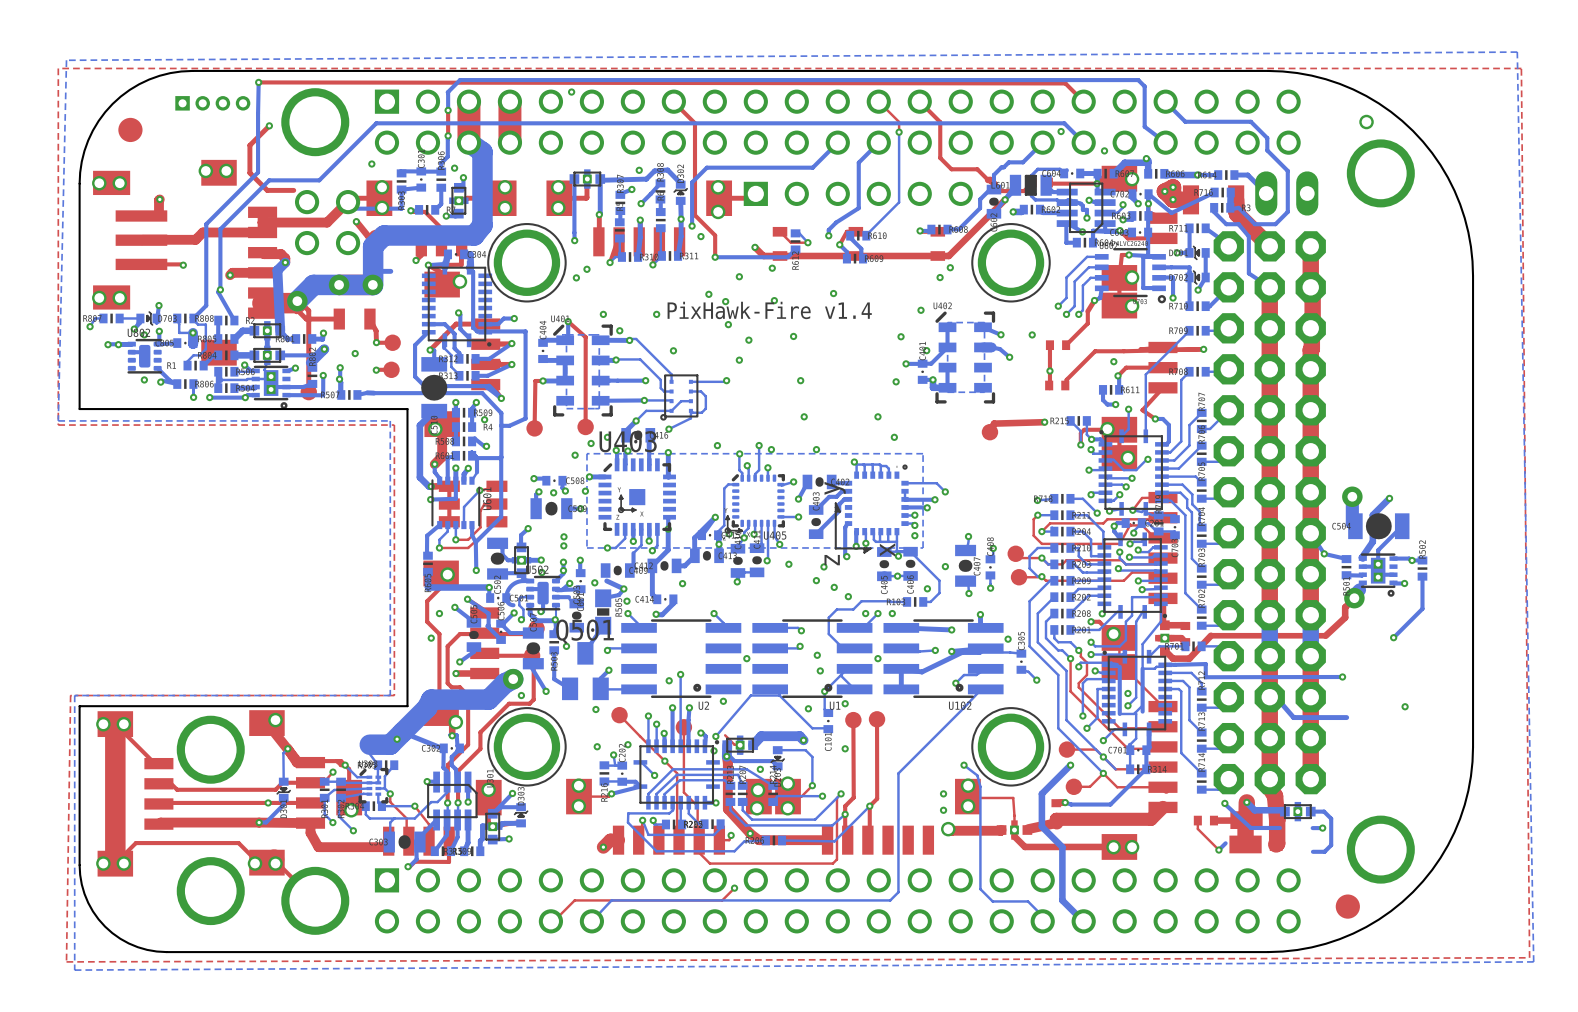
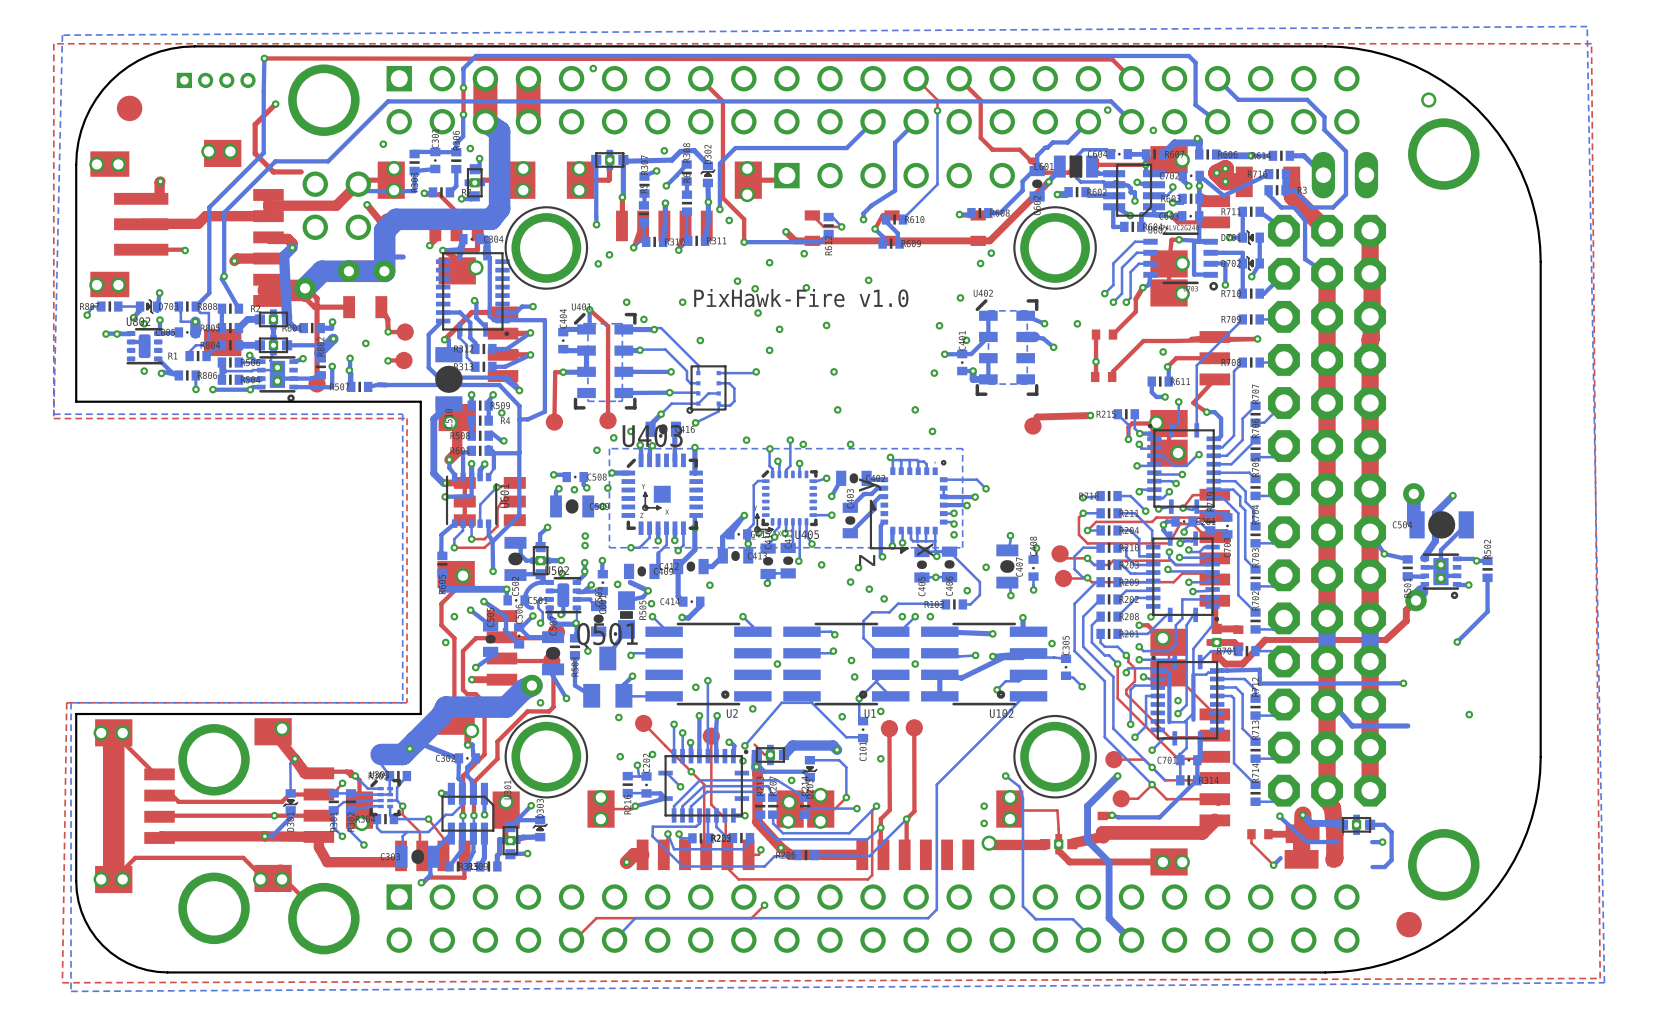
text: PixHawk-Fire v1.4 (769, 310) -> PixHawk-Fire v1.0 (801, 298)

